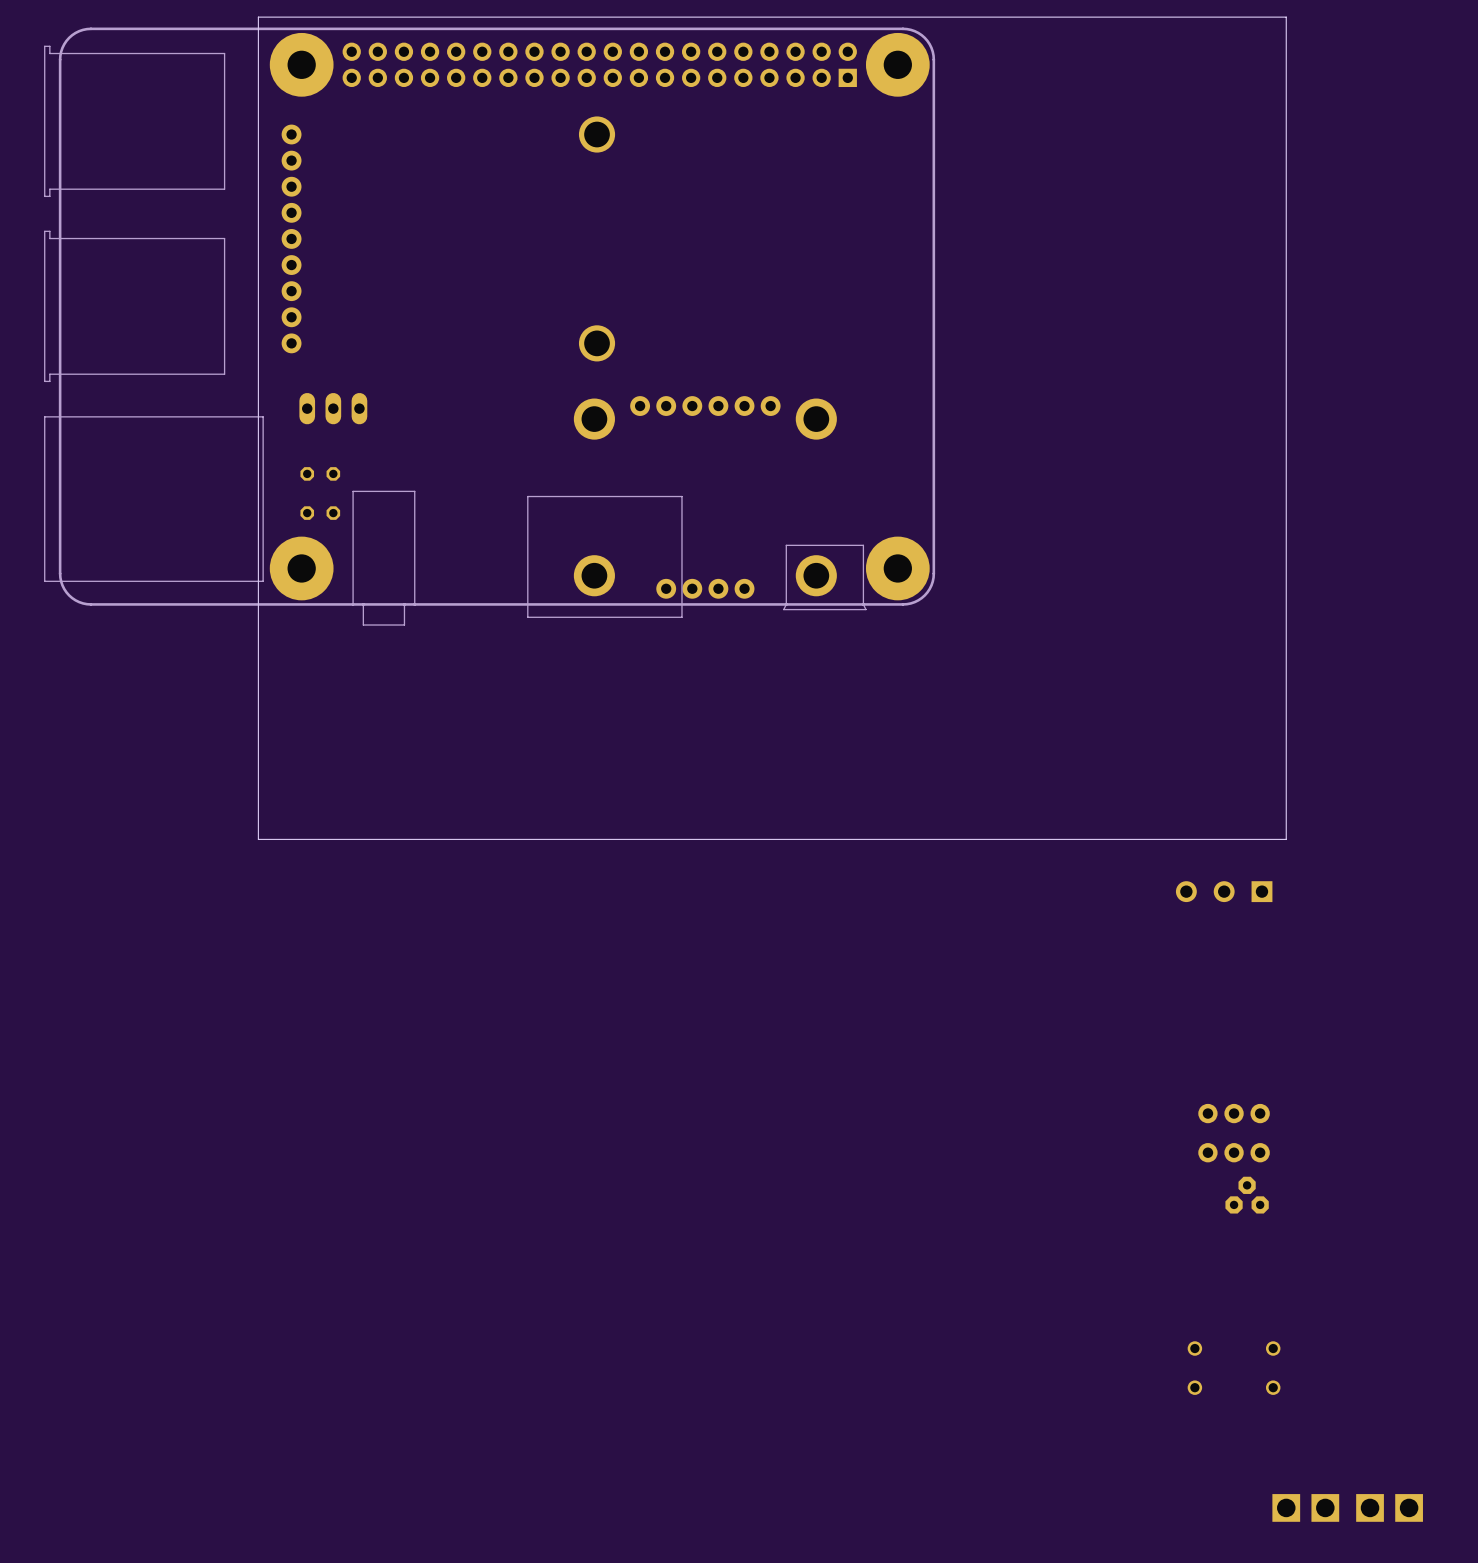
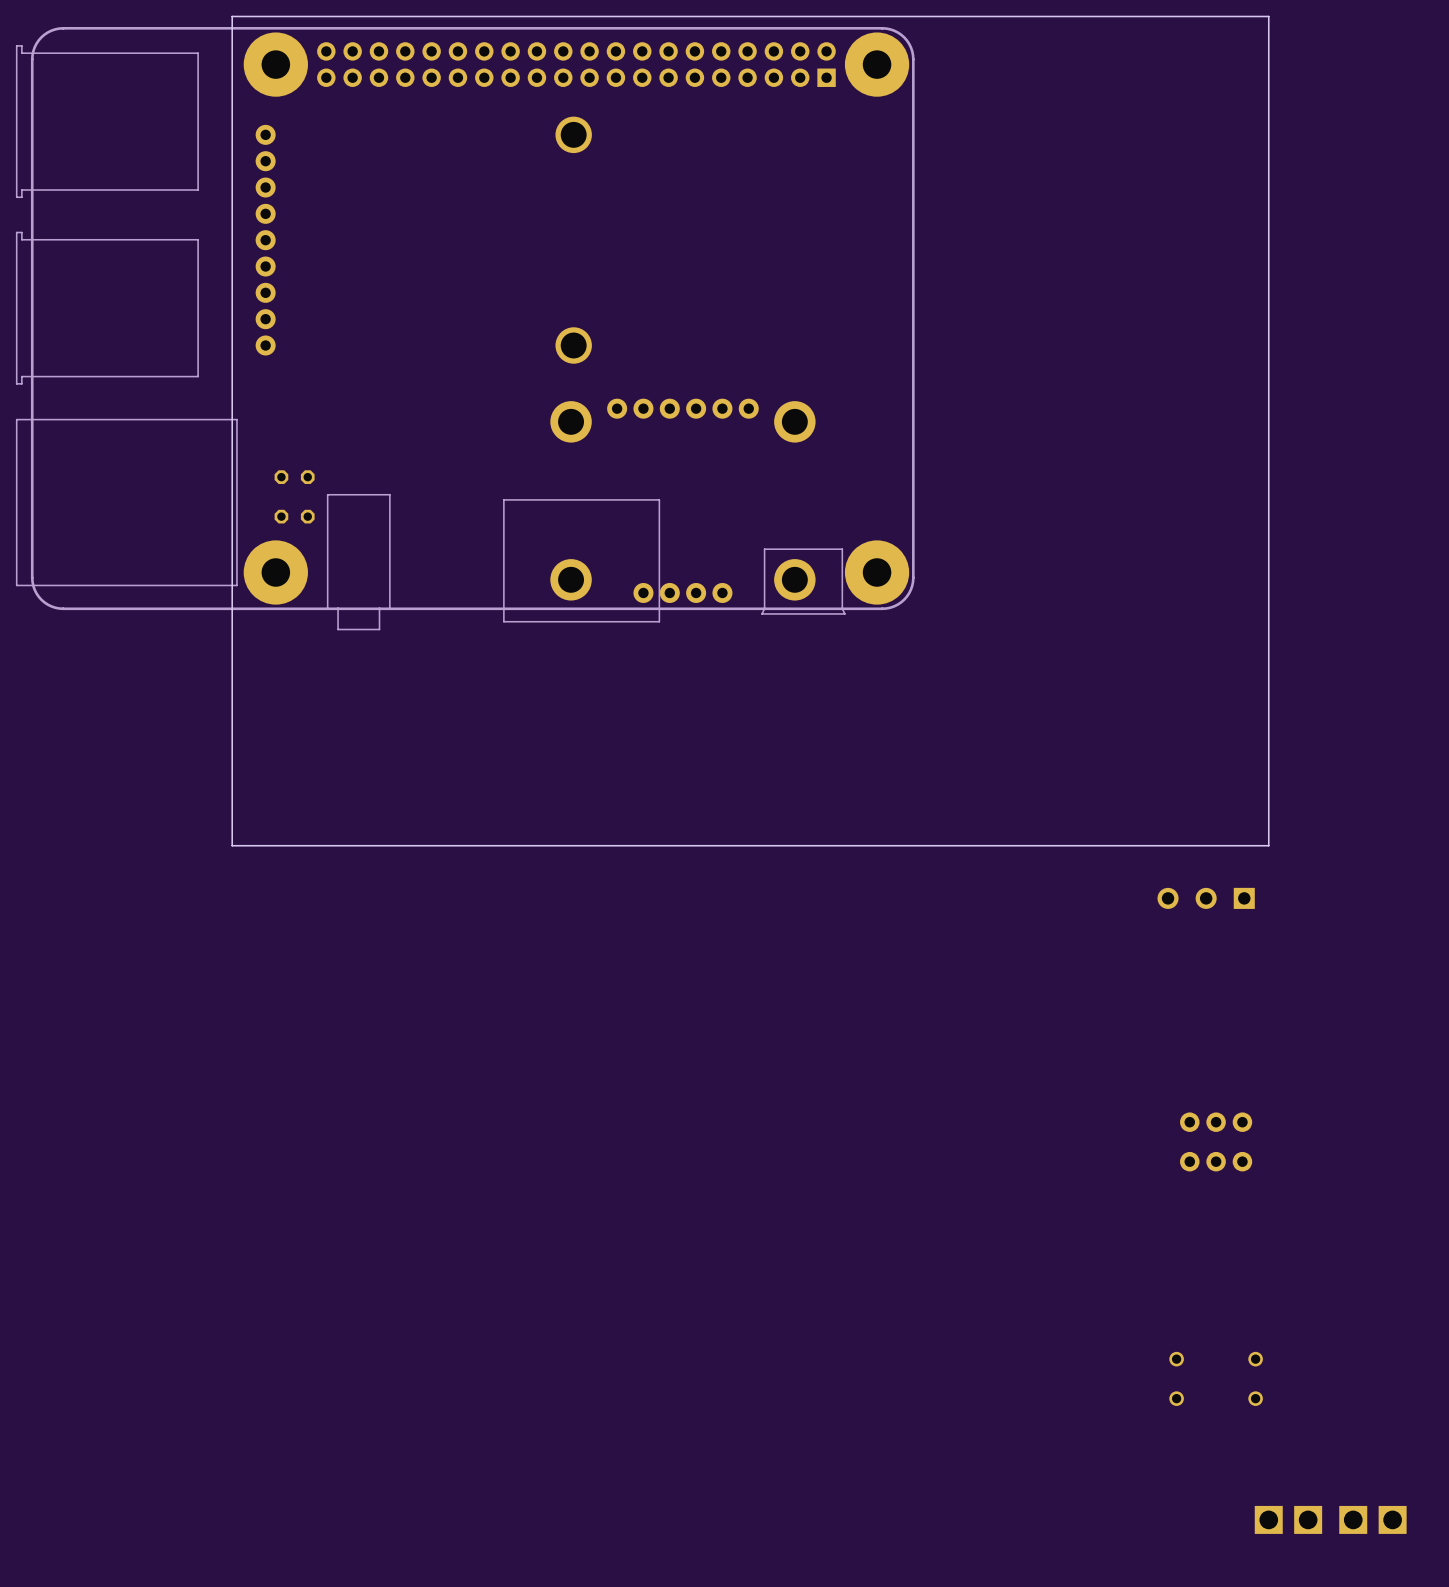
part: (333, 408) -> none
part: (1247, 1195) -> none

